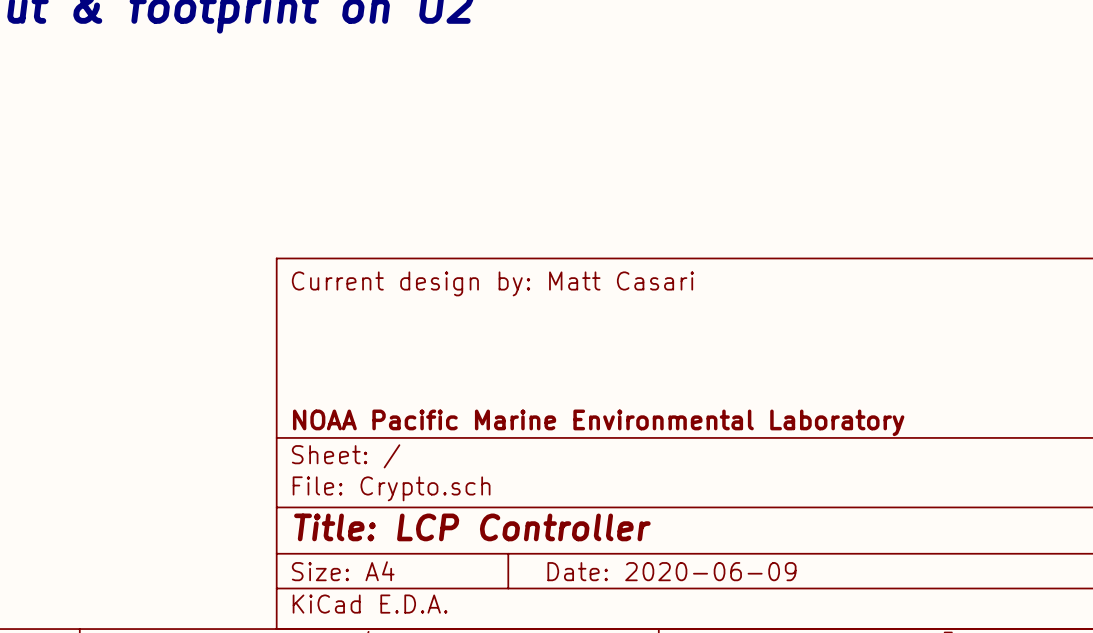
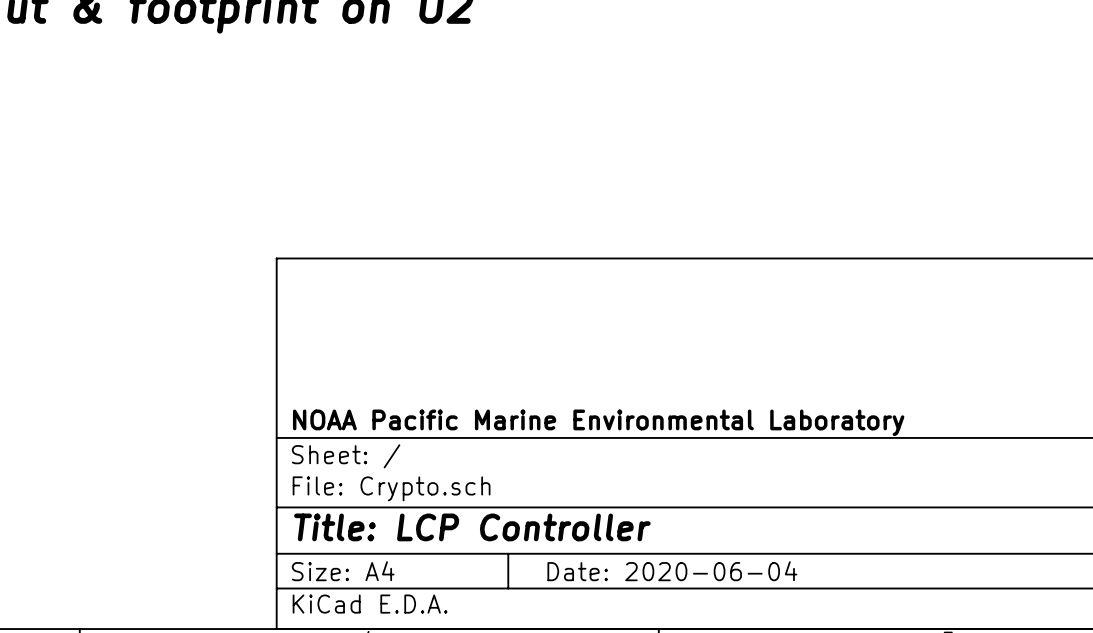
title block: Current design by: Matt Casari (492, 283) -> none
title block: Date: 2020-06-09 (671, 571) -> Date: 2020-06-04 (672, 571)

